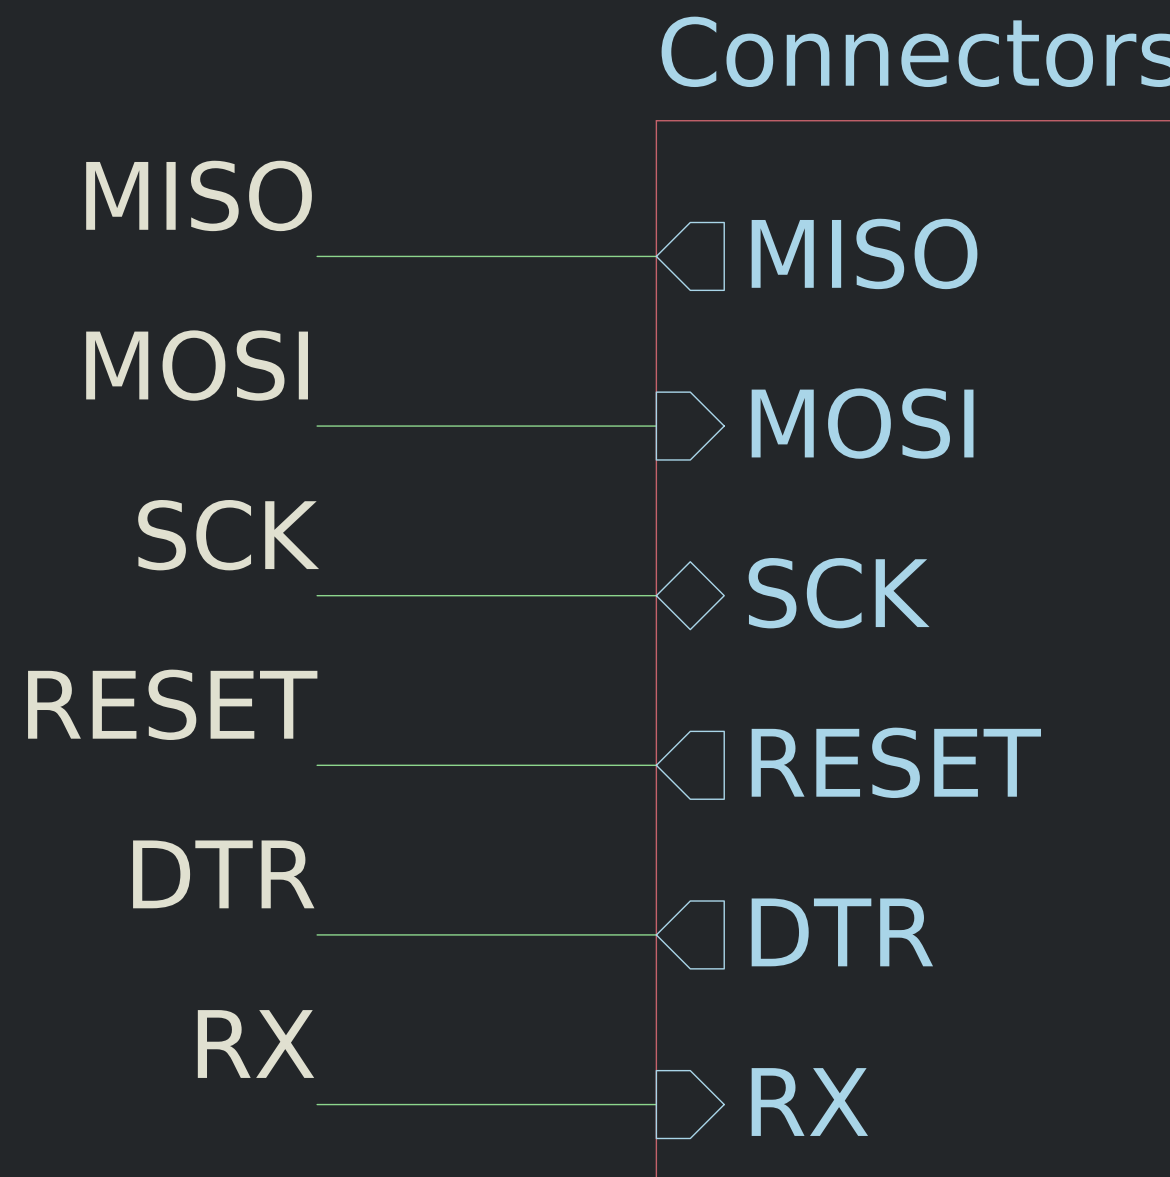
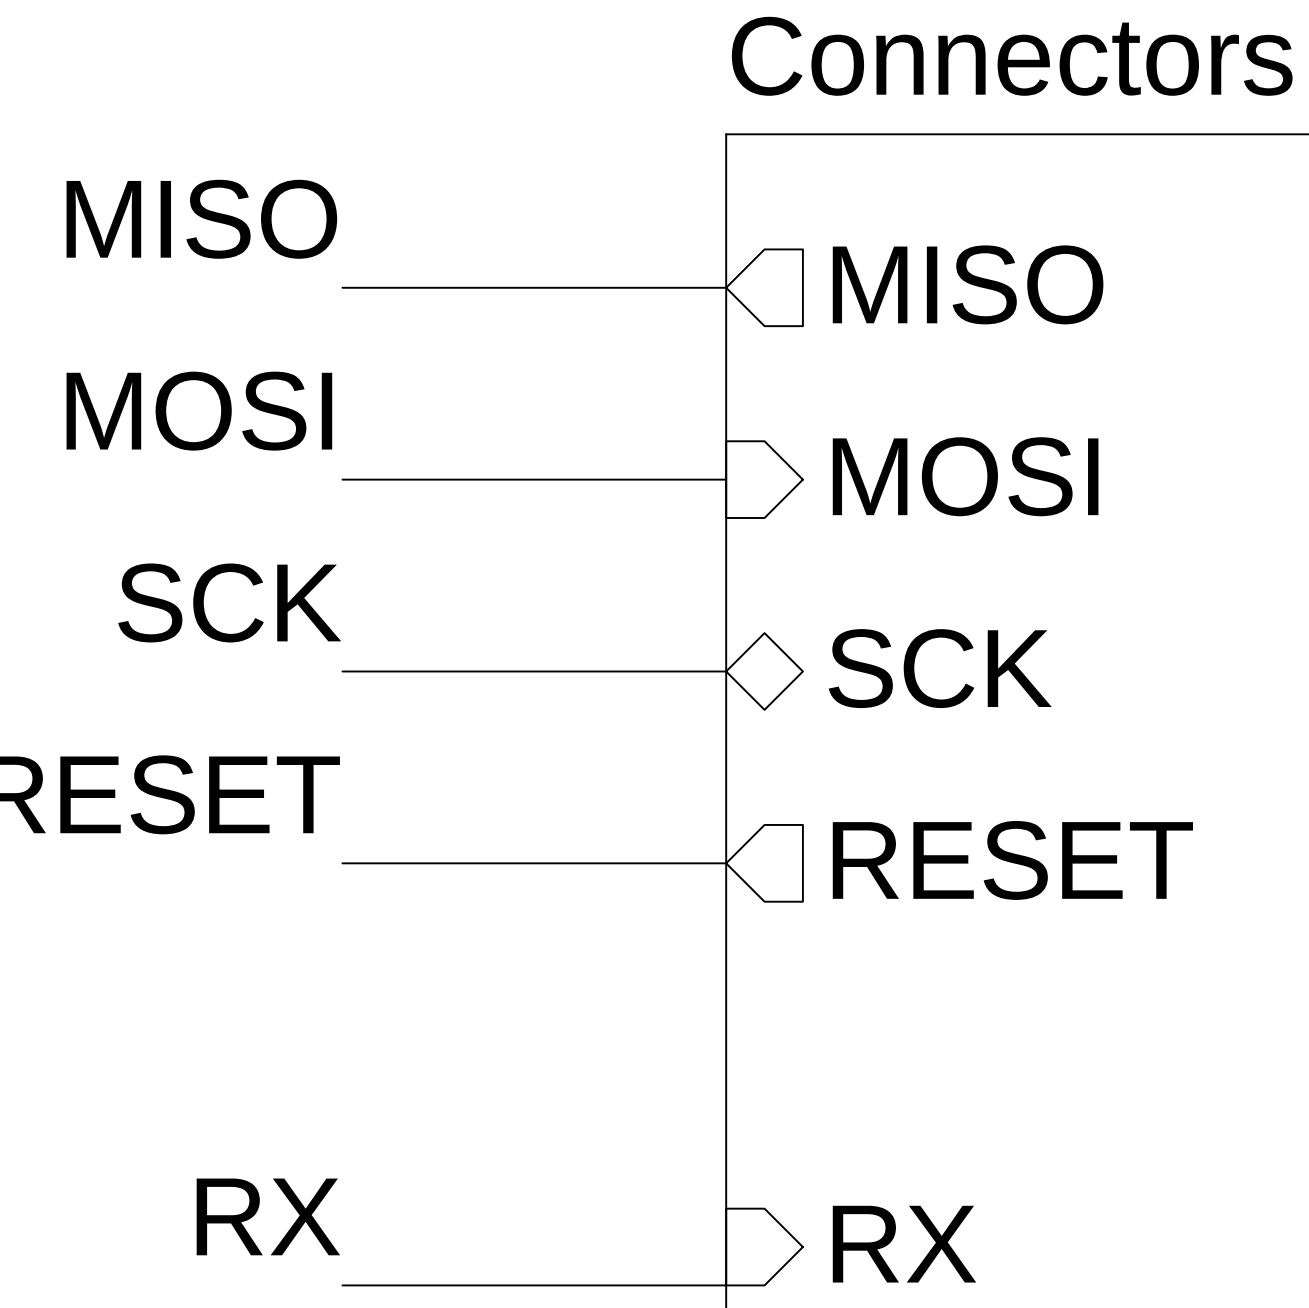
label: DTR (223, 874) -> none
sheet pin: DTR (842, 932) -> none
wire: (317, 934) (656, 934) -> none
label position: RX (256, 1044) -> RX (268, 1216)
wire: (317, 1104) (656, 1104) -> (342, 1285) (726, 1285)

